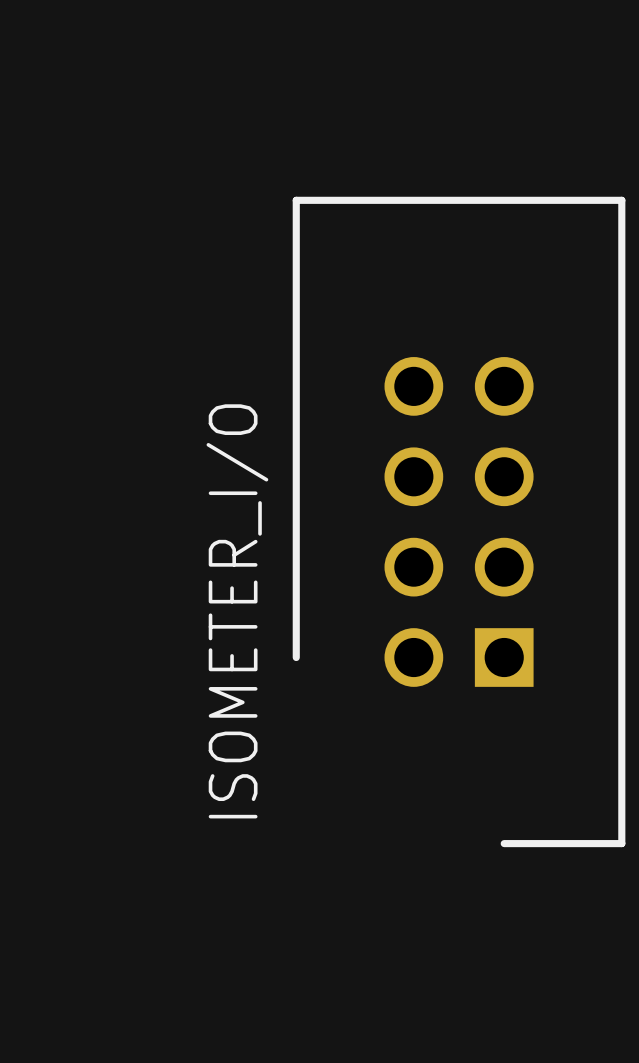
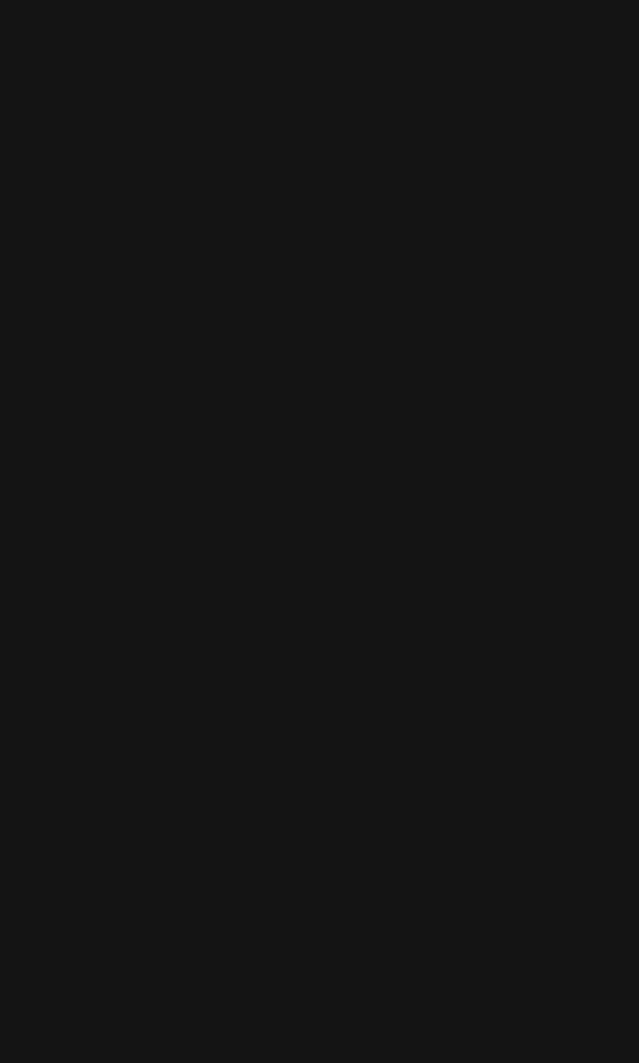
ISOMETER_I/O: (459, 521) -> none

